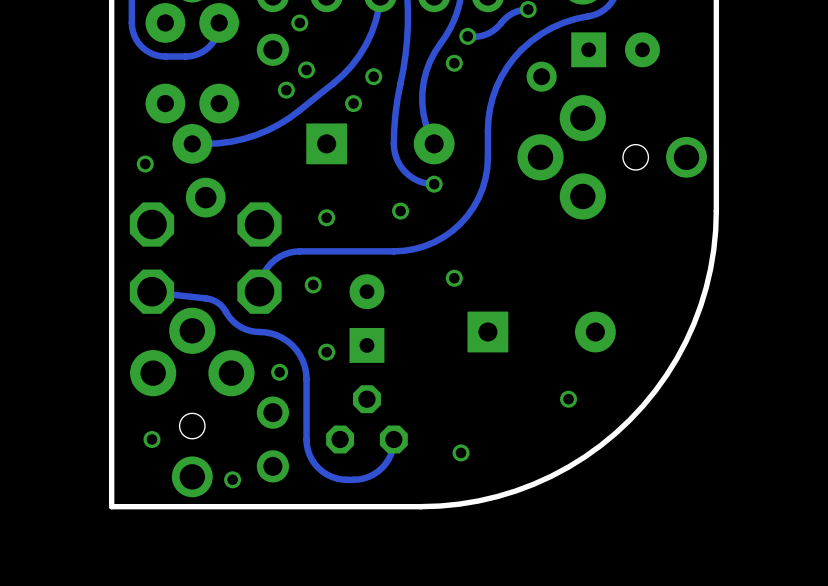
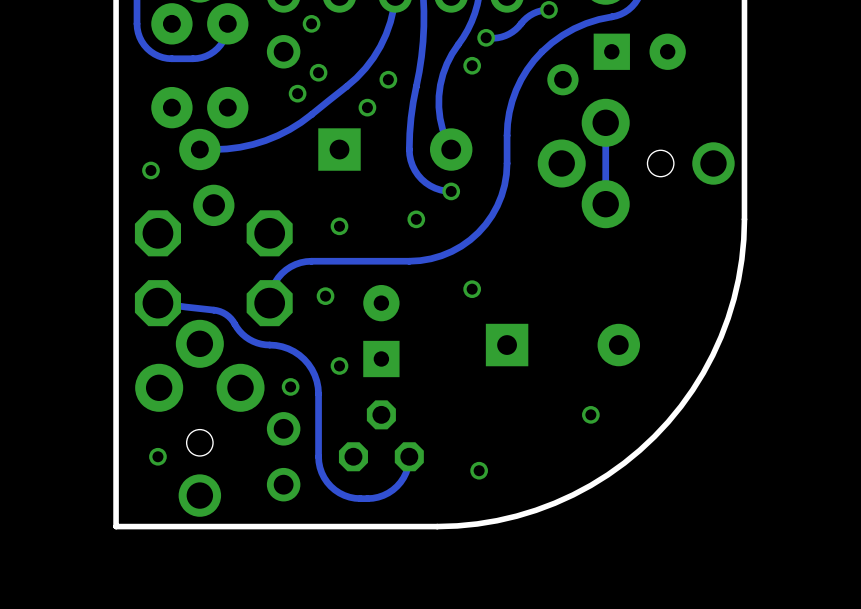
track: none -> (605, 122) (605, 204)
via: (232, 479) -> none

